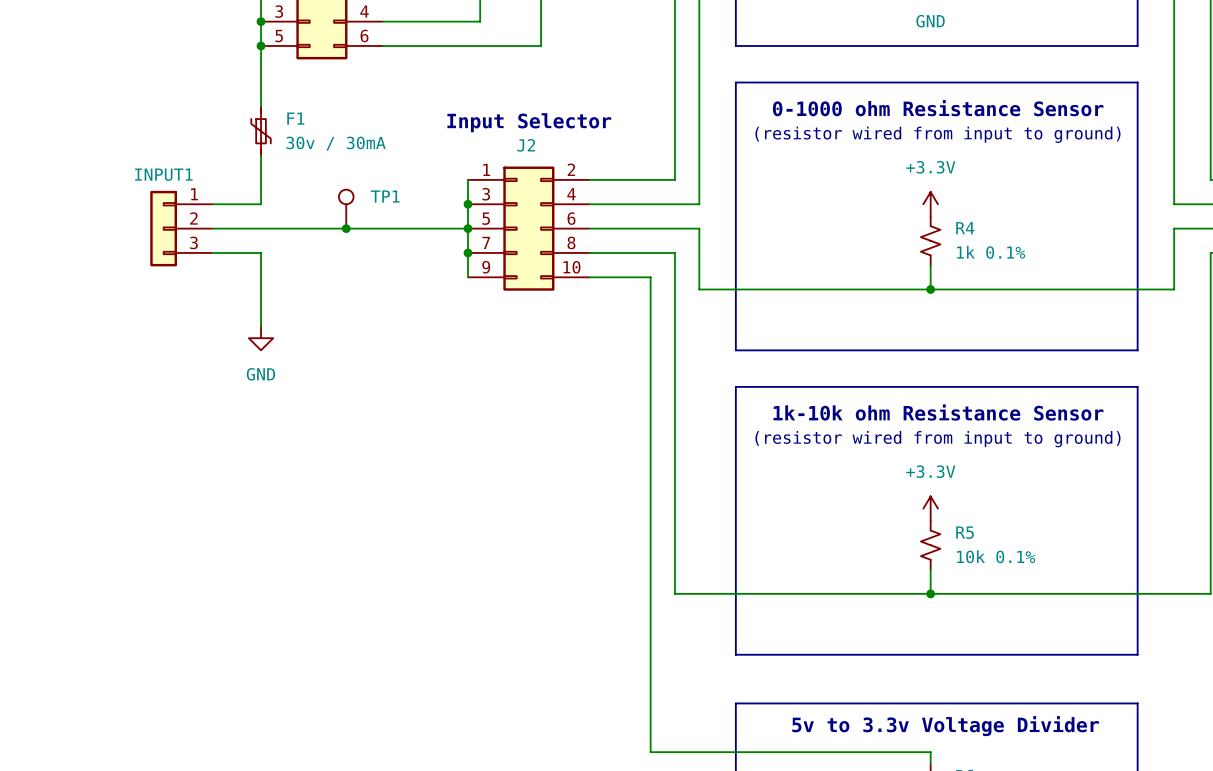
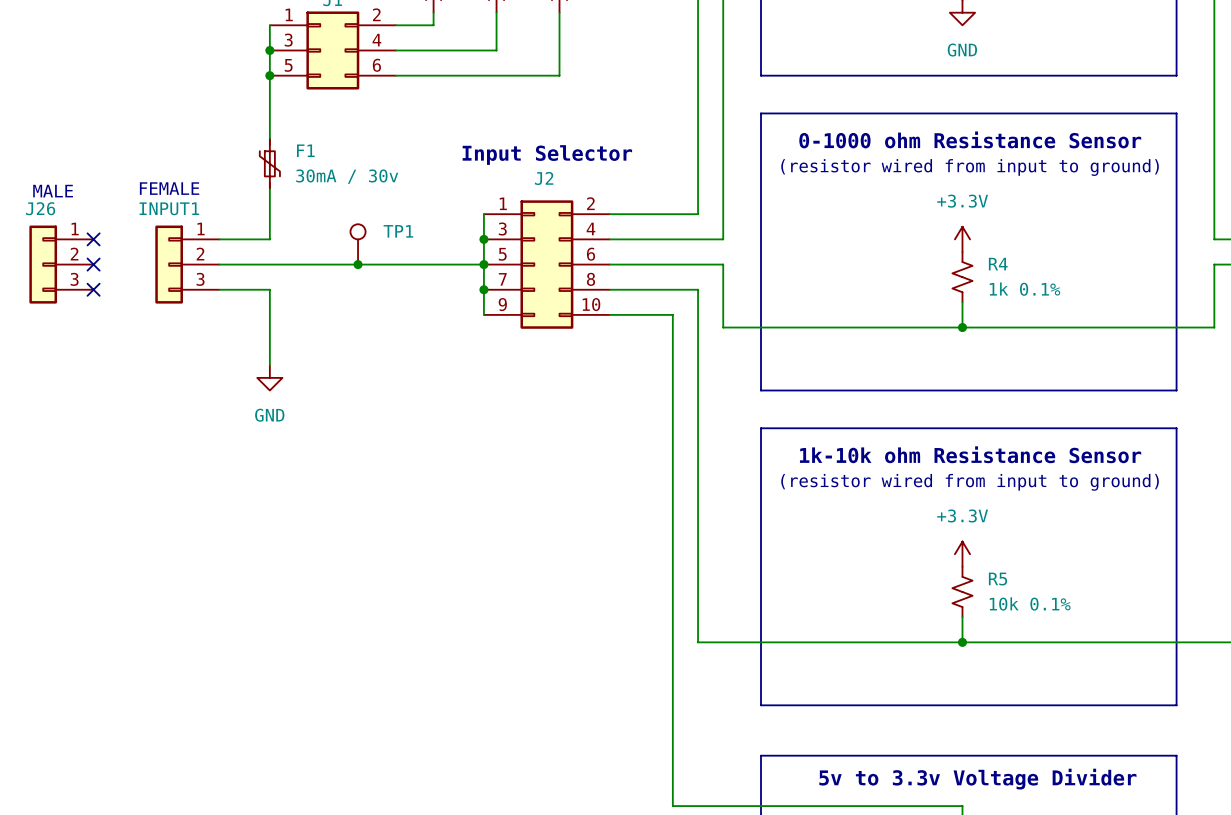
F1 value: 30v / 30mA (336, 143) -> 30mA / 30v (347, 176)
text: none -> FEMALE (169, 188)
text: none -> MALE (53, 191)
no-connect mark: none -> (93, 239)
J26: none -> (61, 264)
no-connect mark: none -> (93, 264)
no-connect mark: none -> (93, 289)

